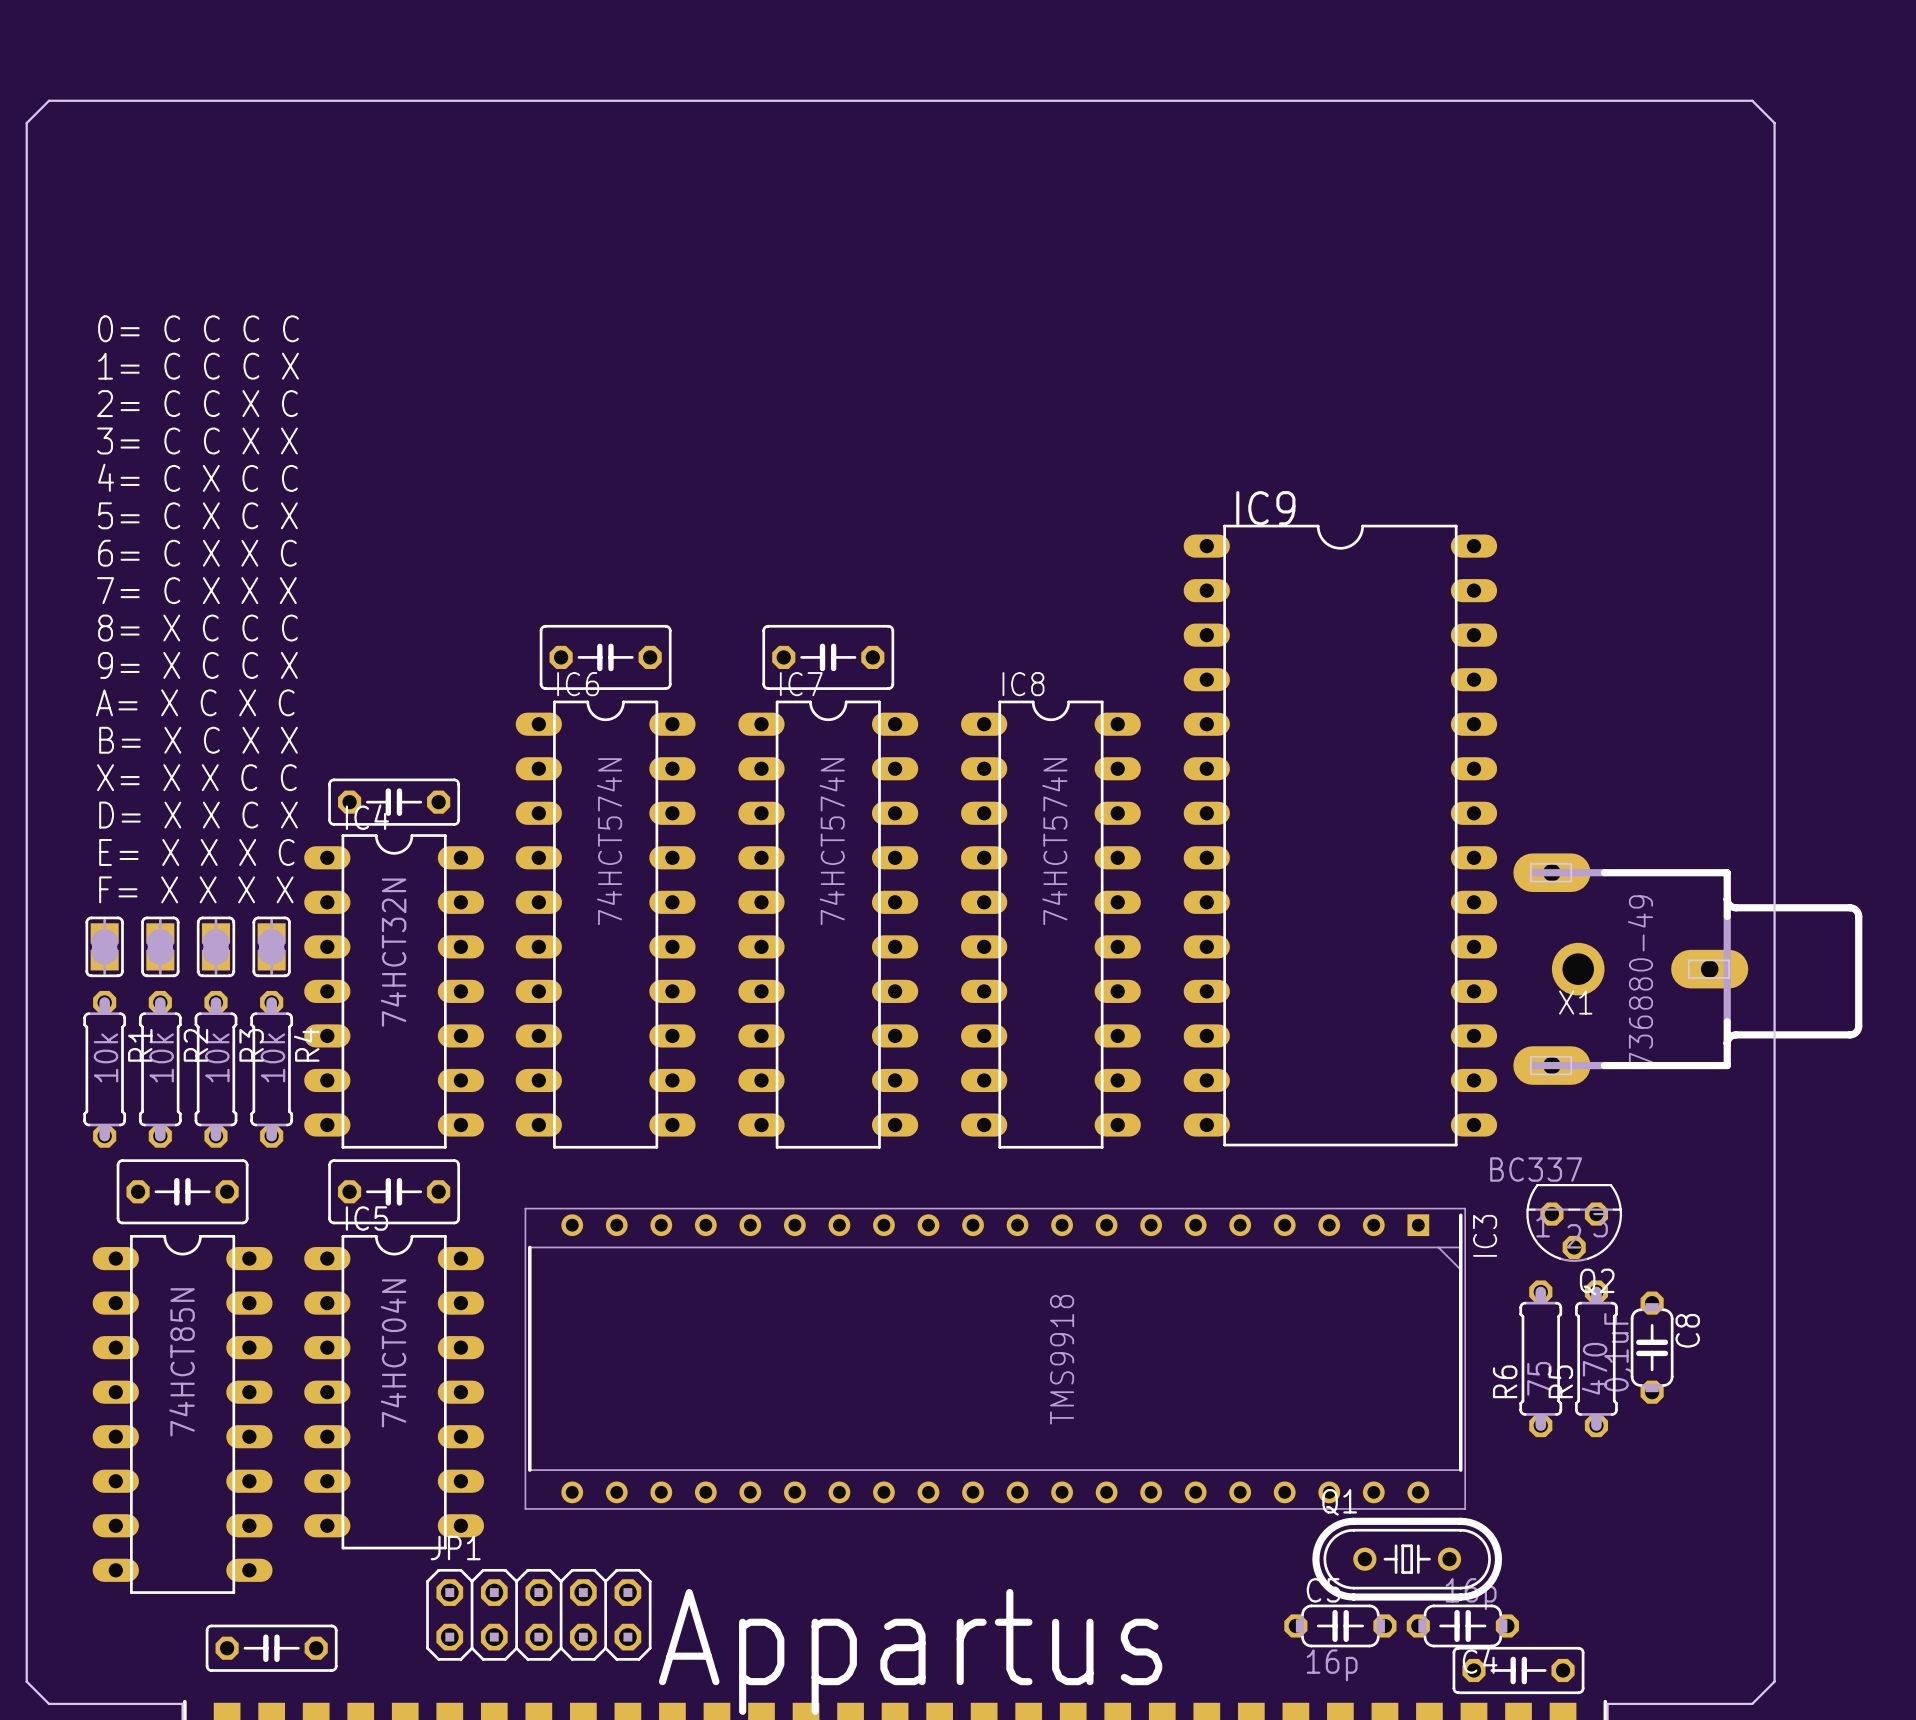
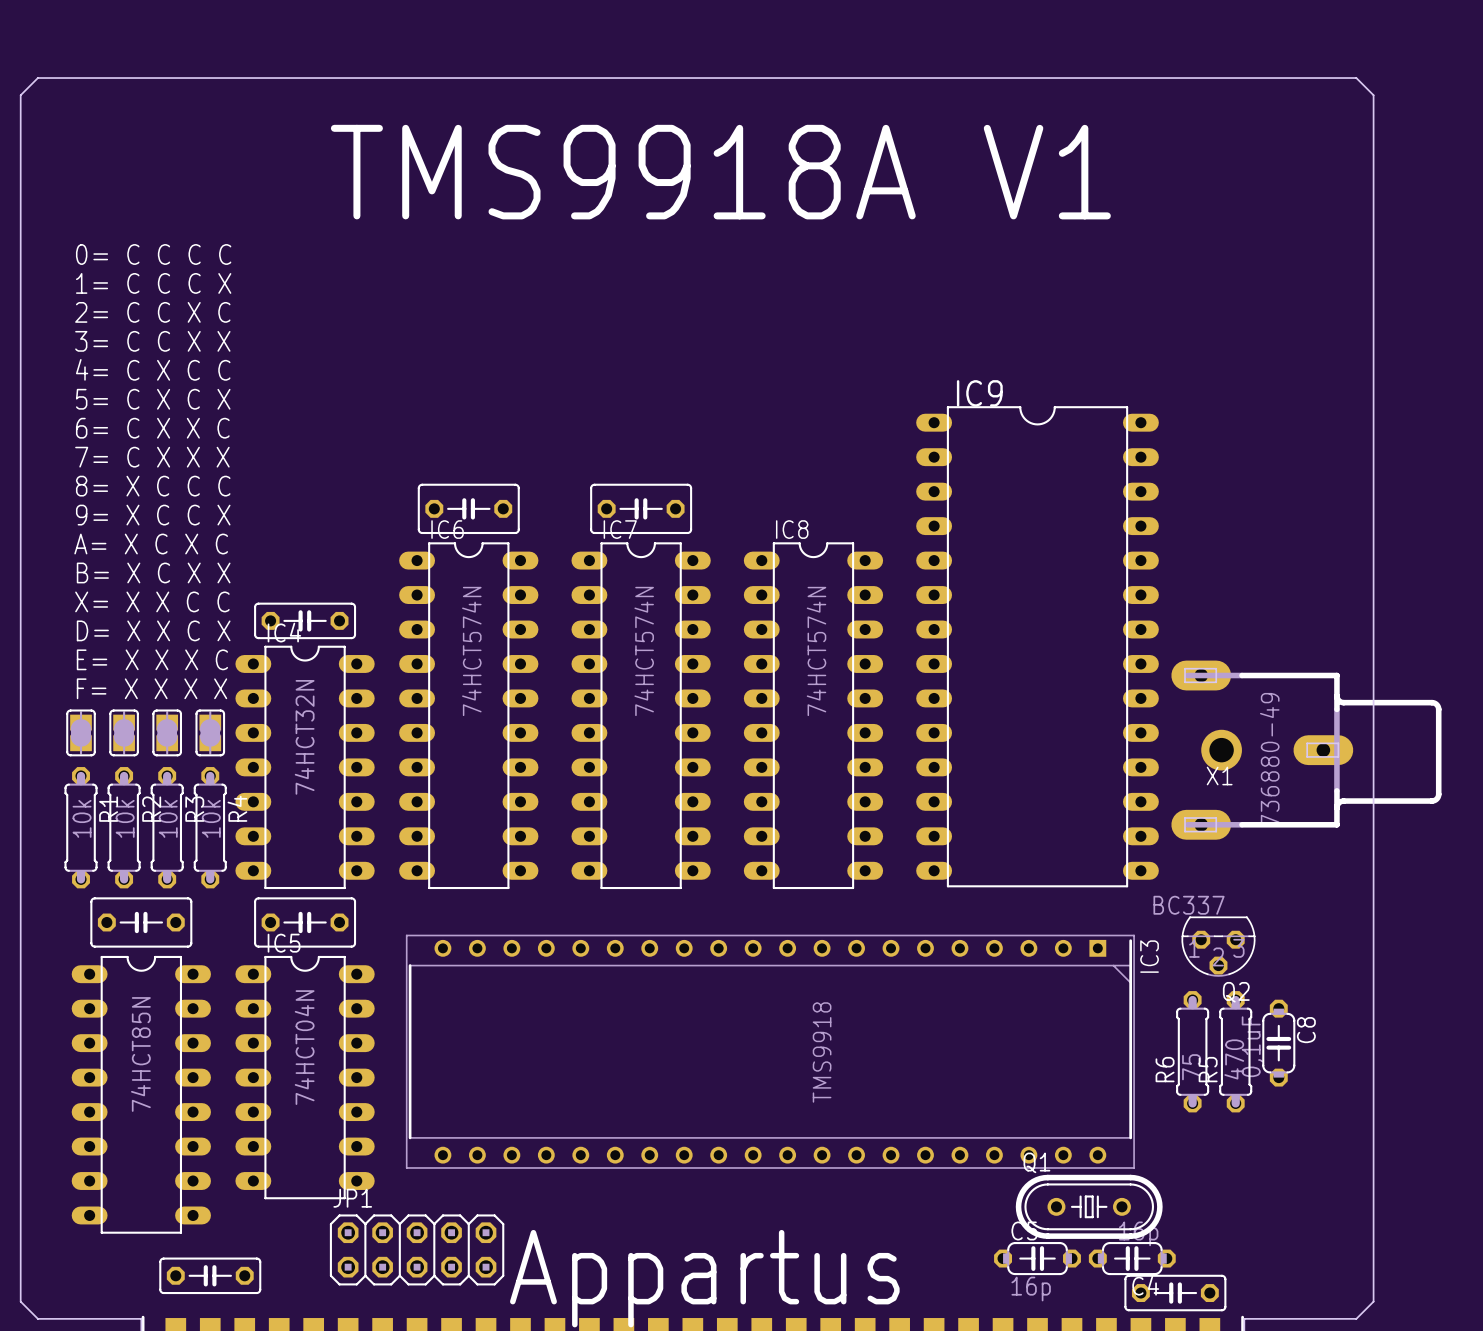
text: none -> TMS9918A V1 (720, 172)

